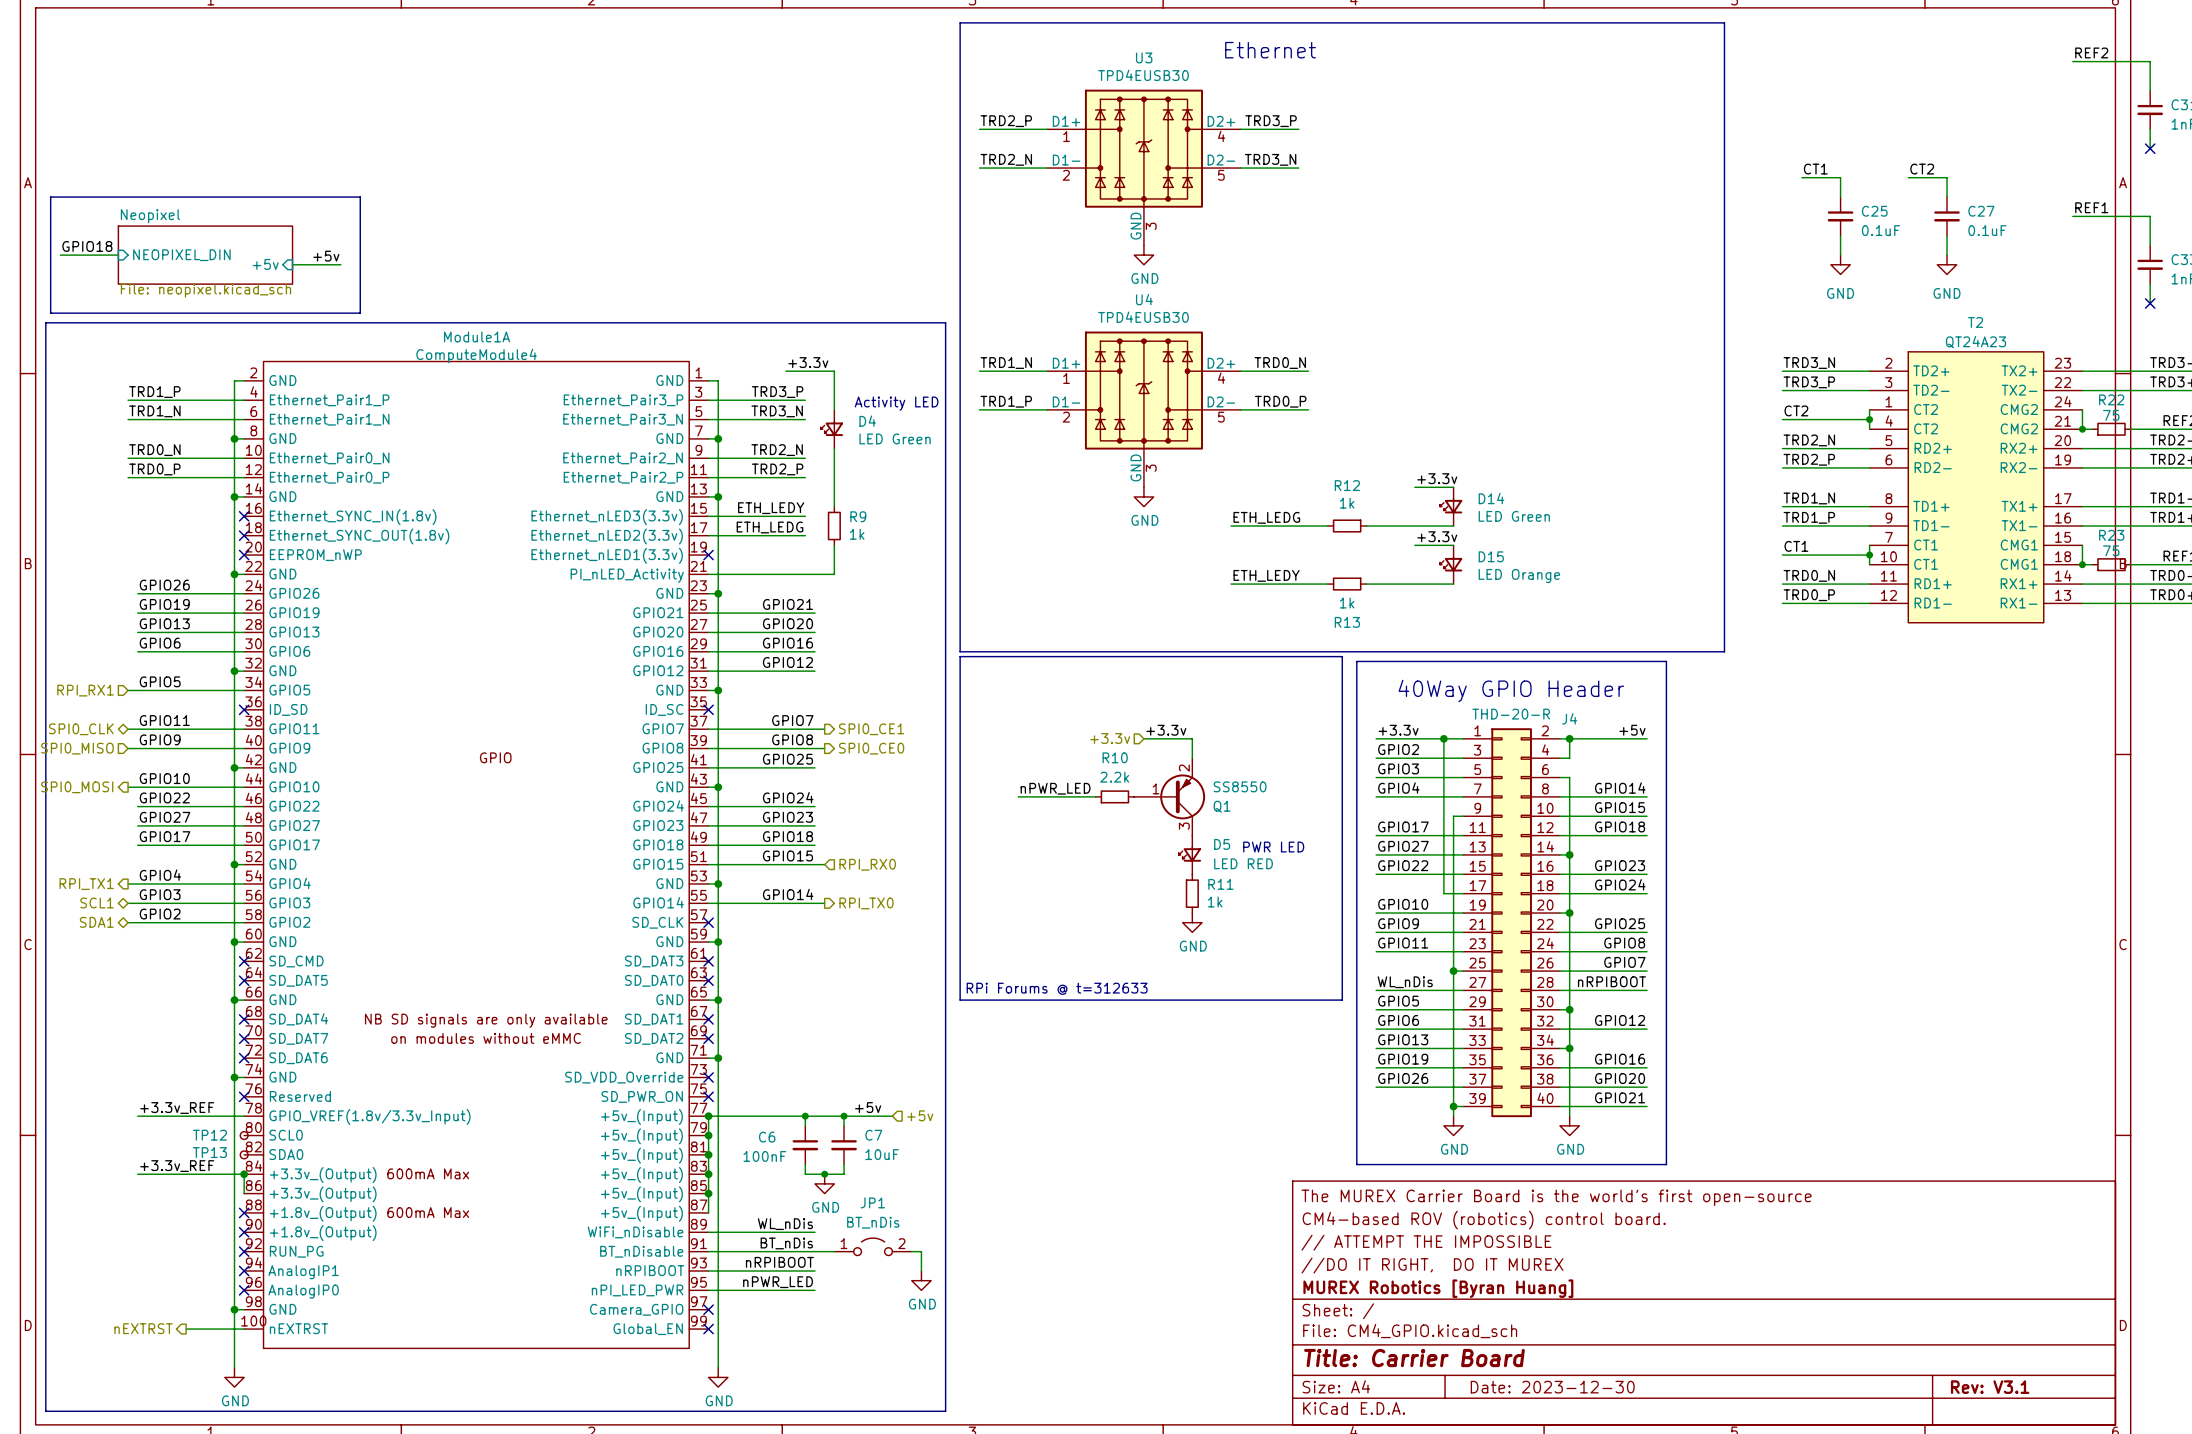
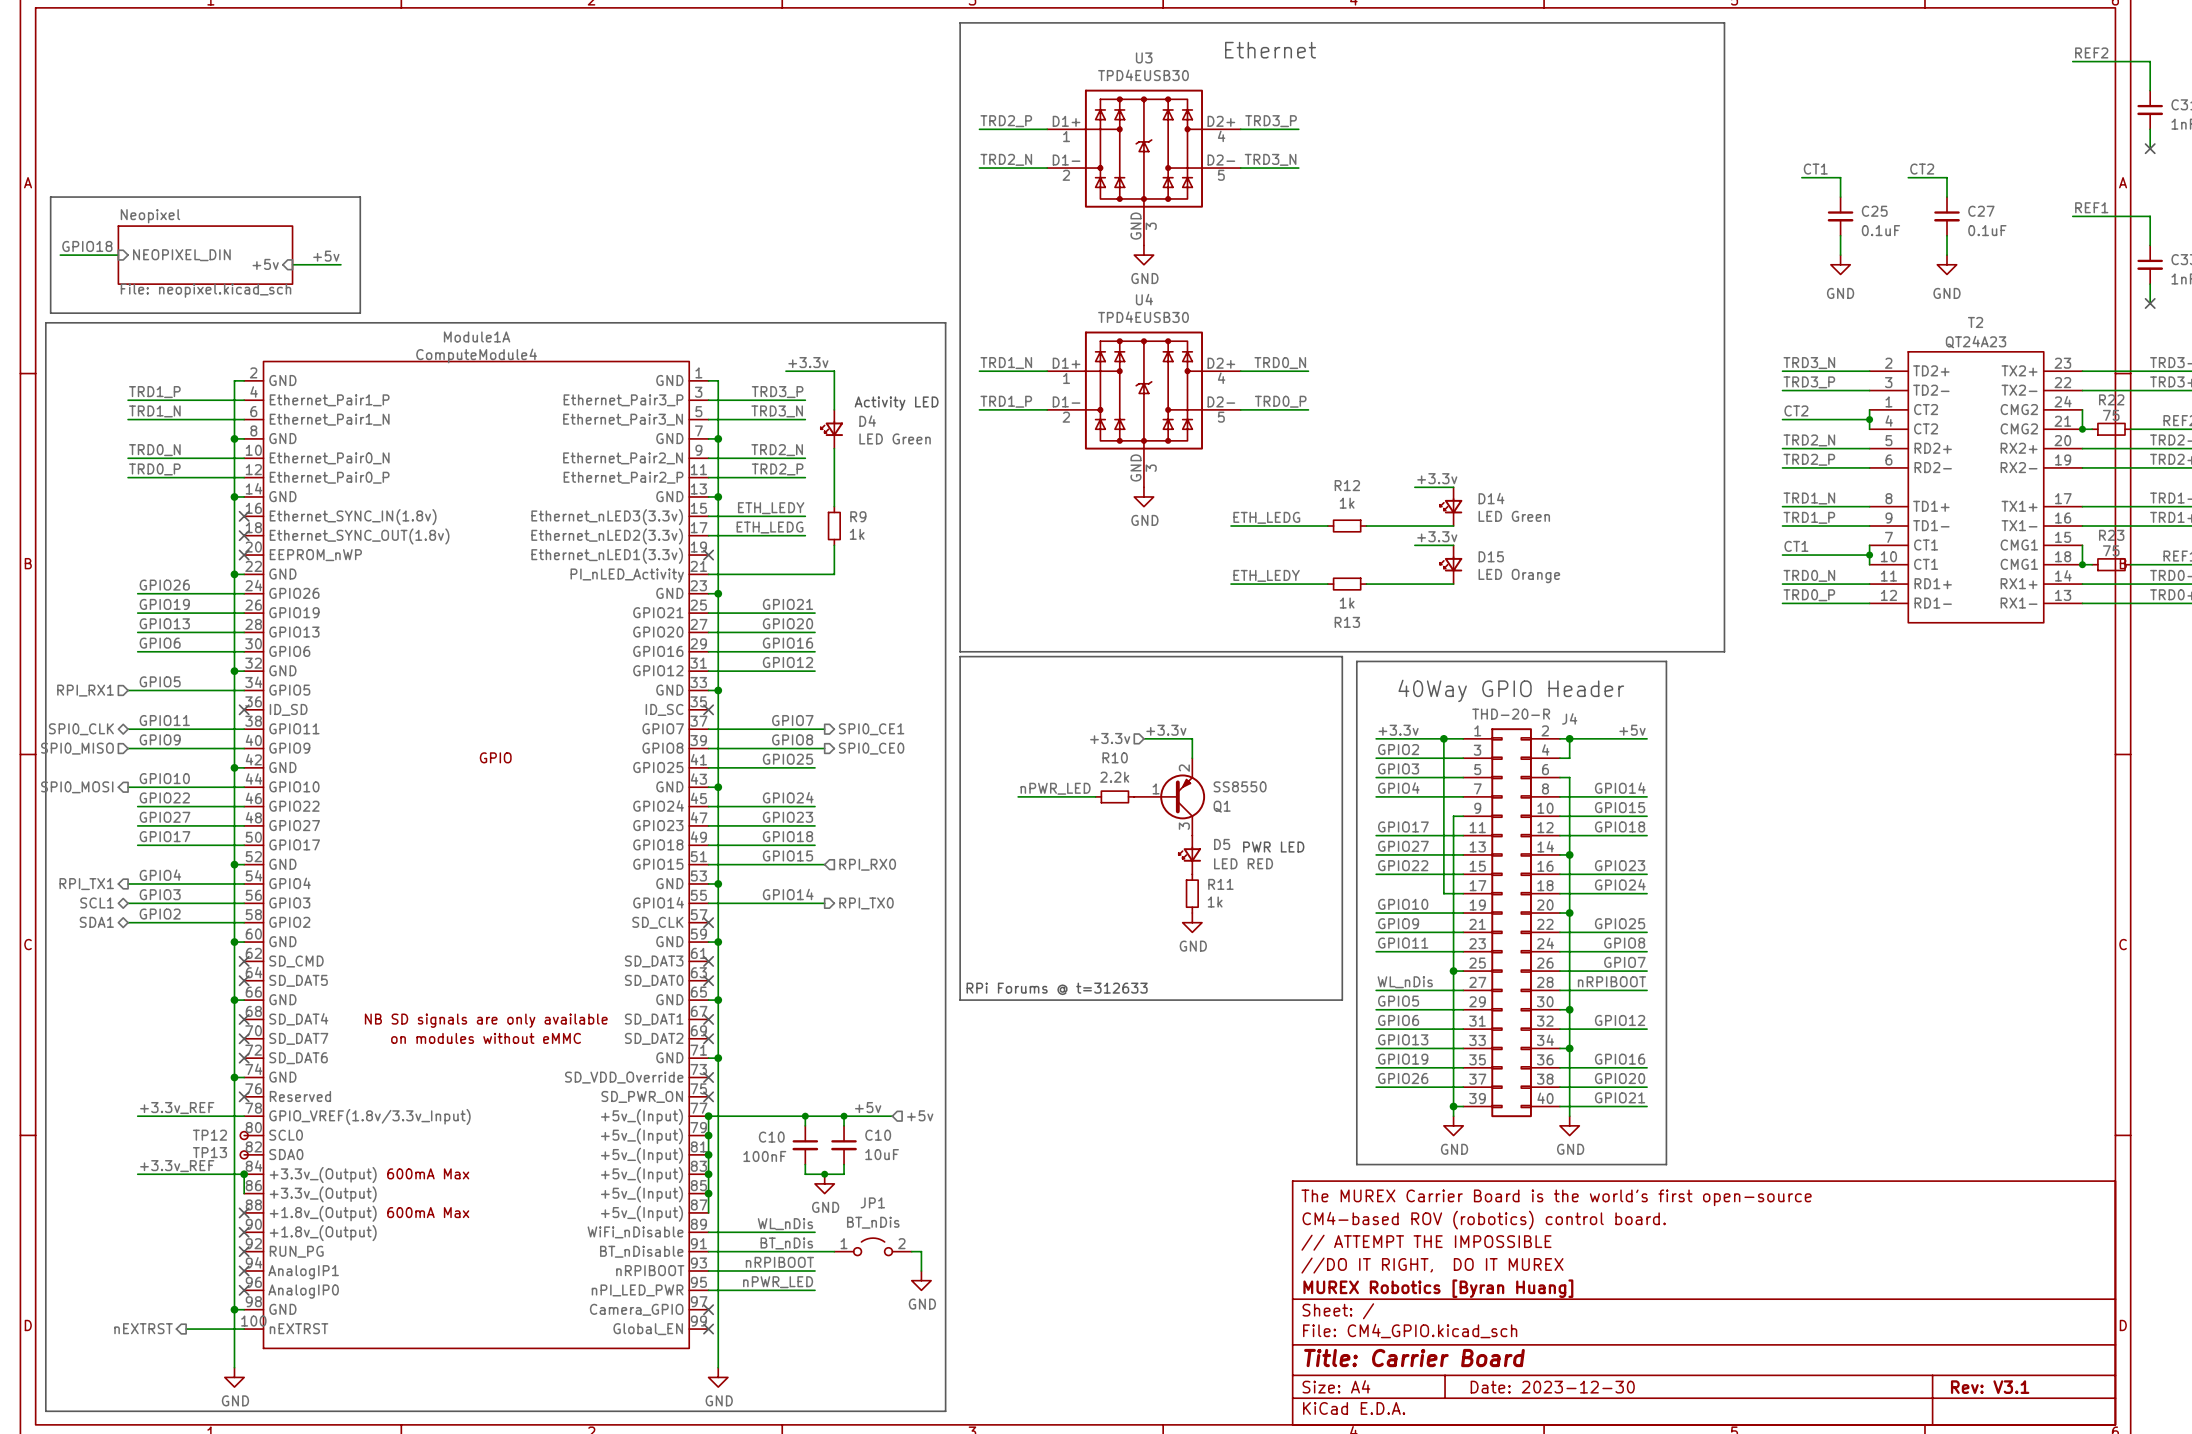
C7 name: C7 (873, 1135) -> C10 (878, 1135)
C6 name: C6 (767, 1137) -> C10 (771, 1137)

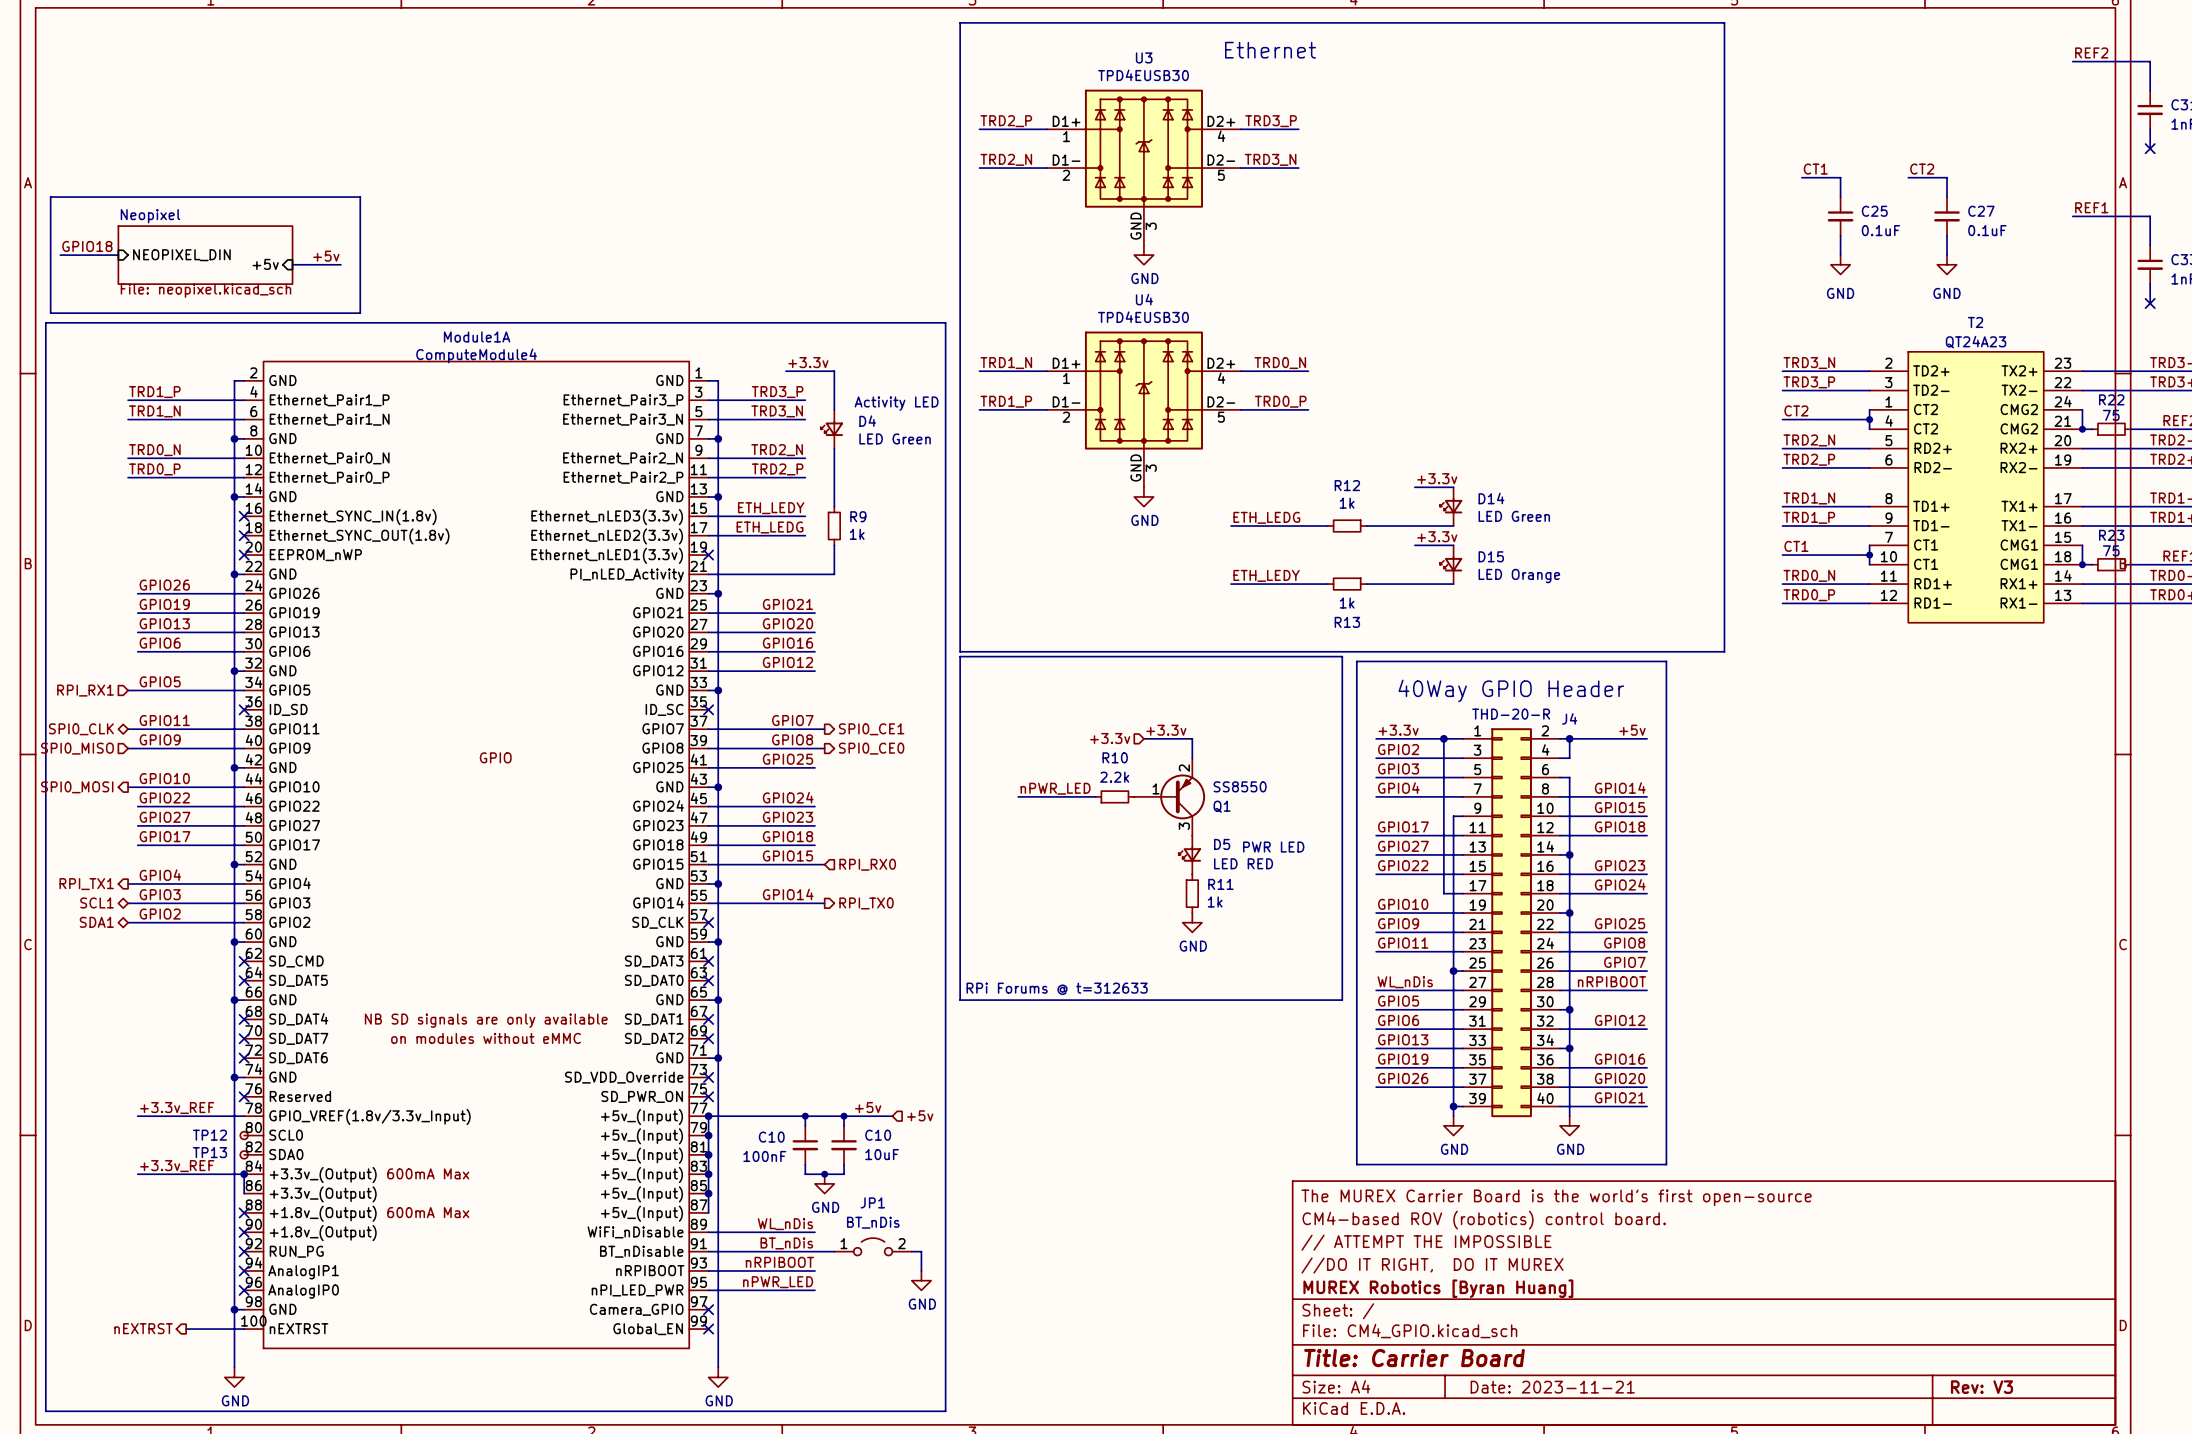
title block: Date: 2023-12-30 (1552, 1387) -> Date: 2023-11-21 (1552, 1387)
title block: Rev: V3.1 (1990, 1387) -> Rev: V3 (1981, 1387)

